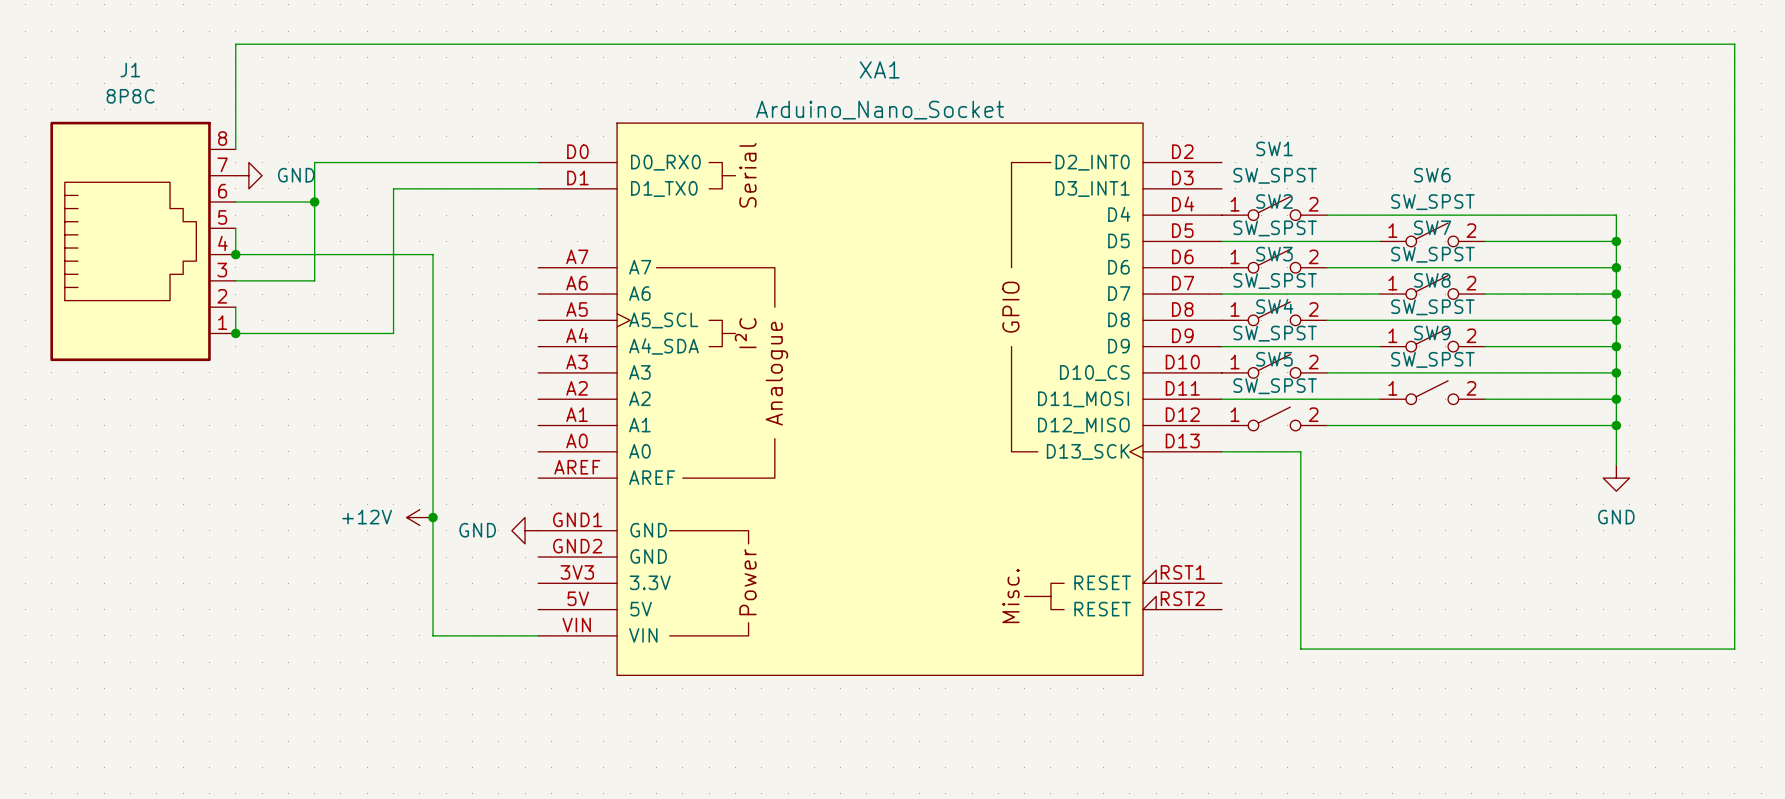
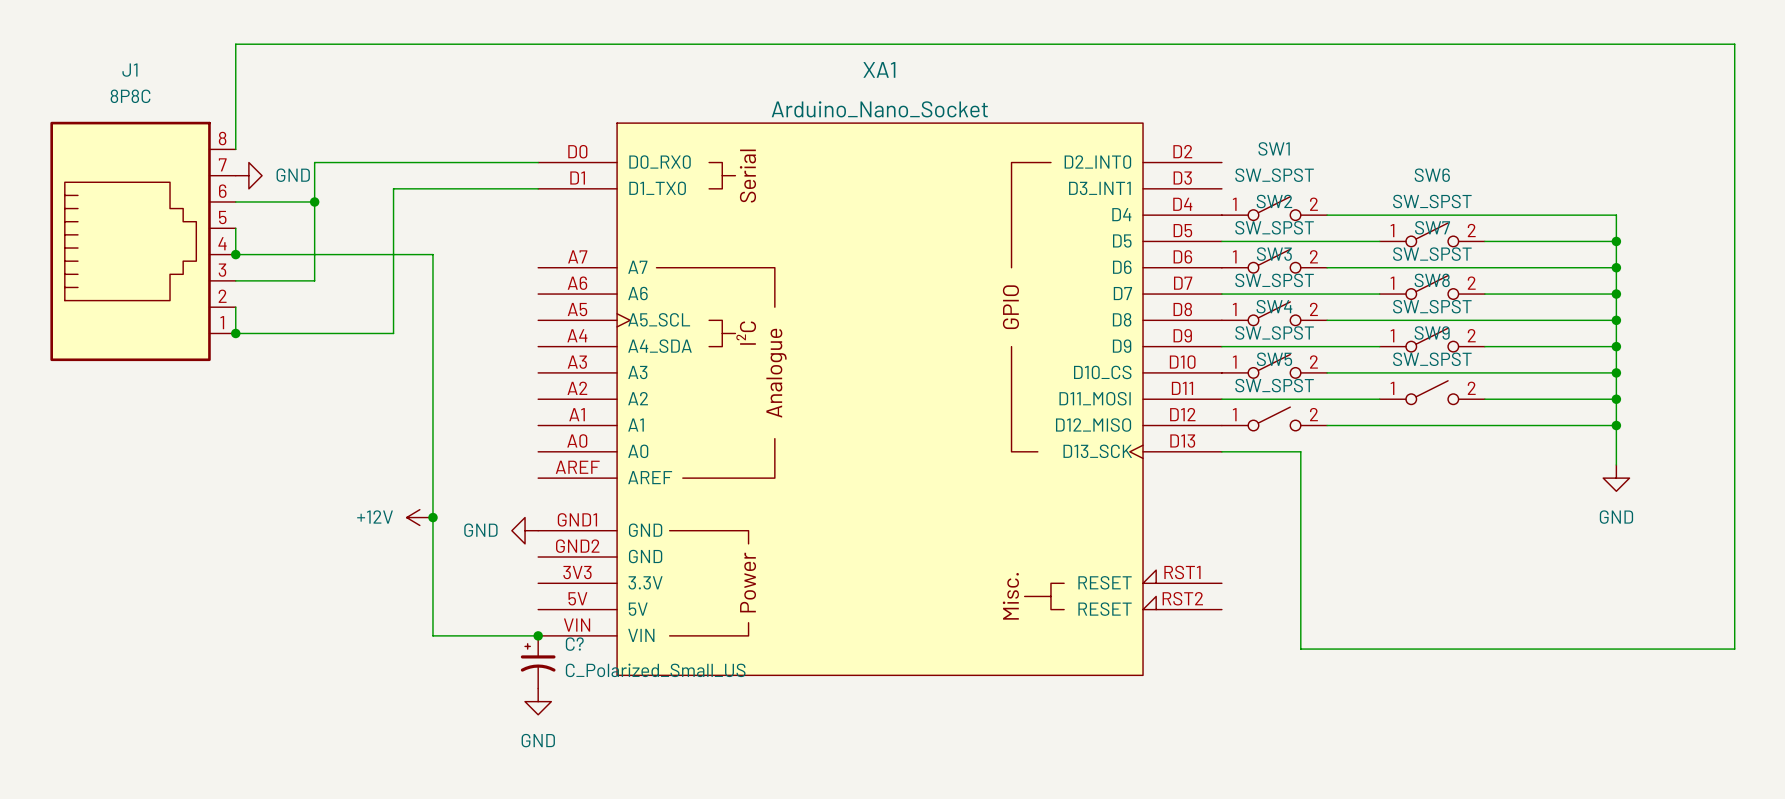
junction: none -> (538, 635)
C?: none -> C_Polarized_Small_US (538, 662)
power symbol: none -> GND (538, 701)

